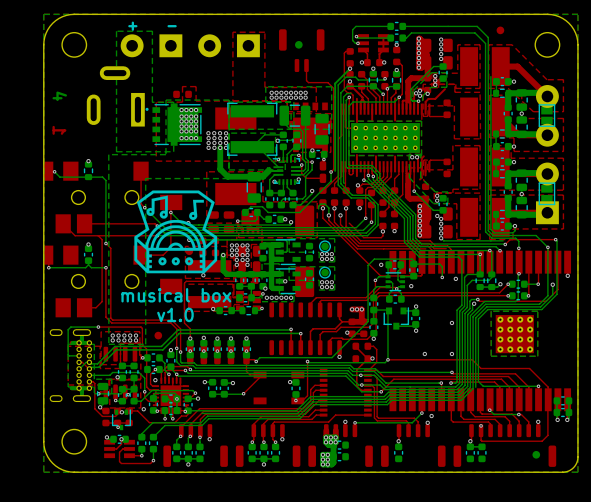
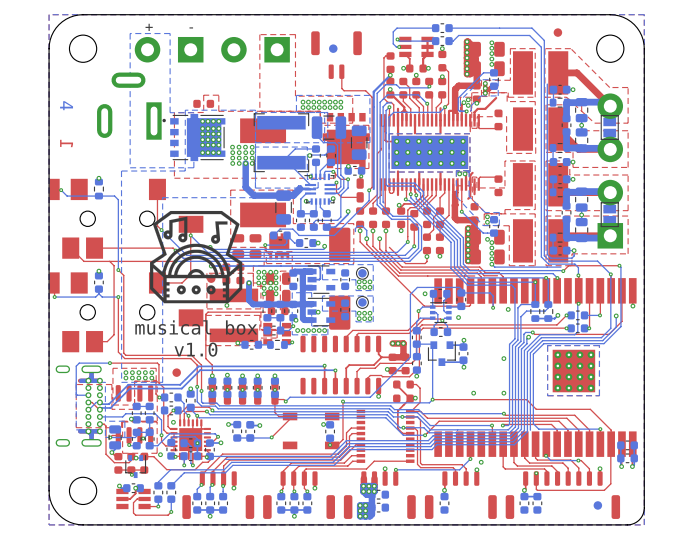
part: (373, 80) -> none
part: (396, 80) -> none
bottom track: (396, 86) (389, 86) (387, 88) -> none
via: (387, 88) -> none

